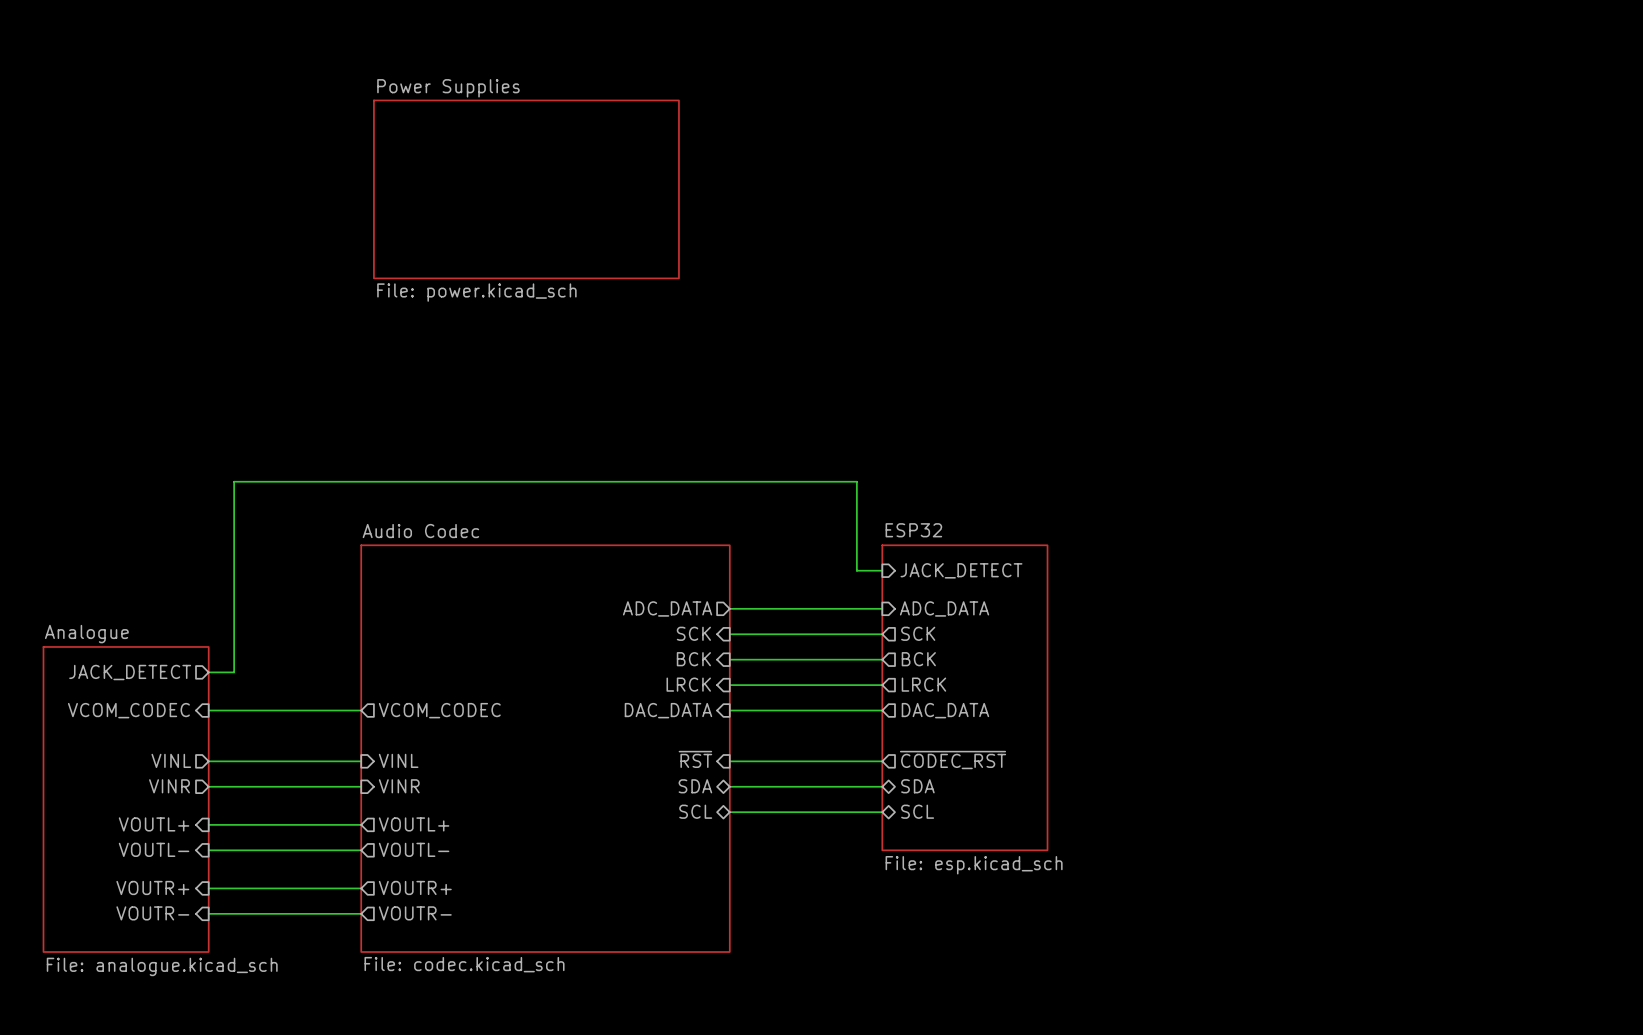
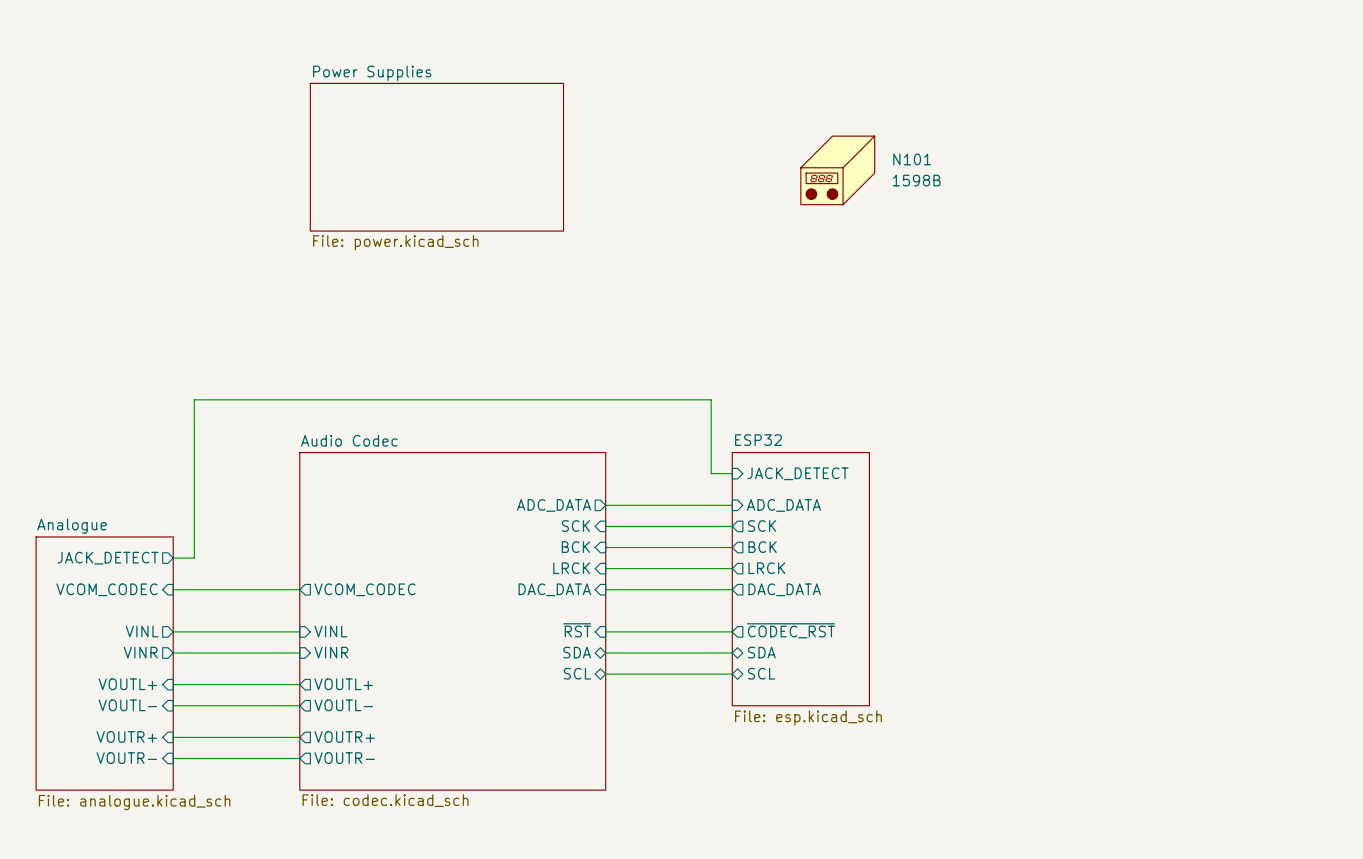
N101: none -> 1598B (837, 170)

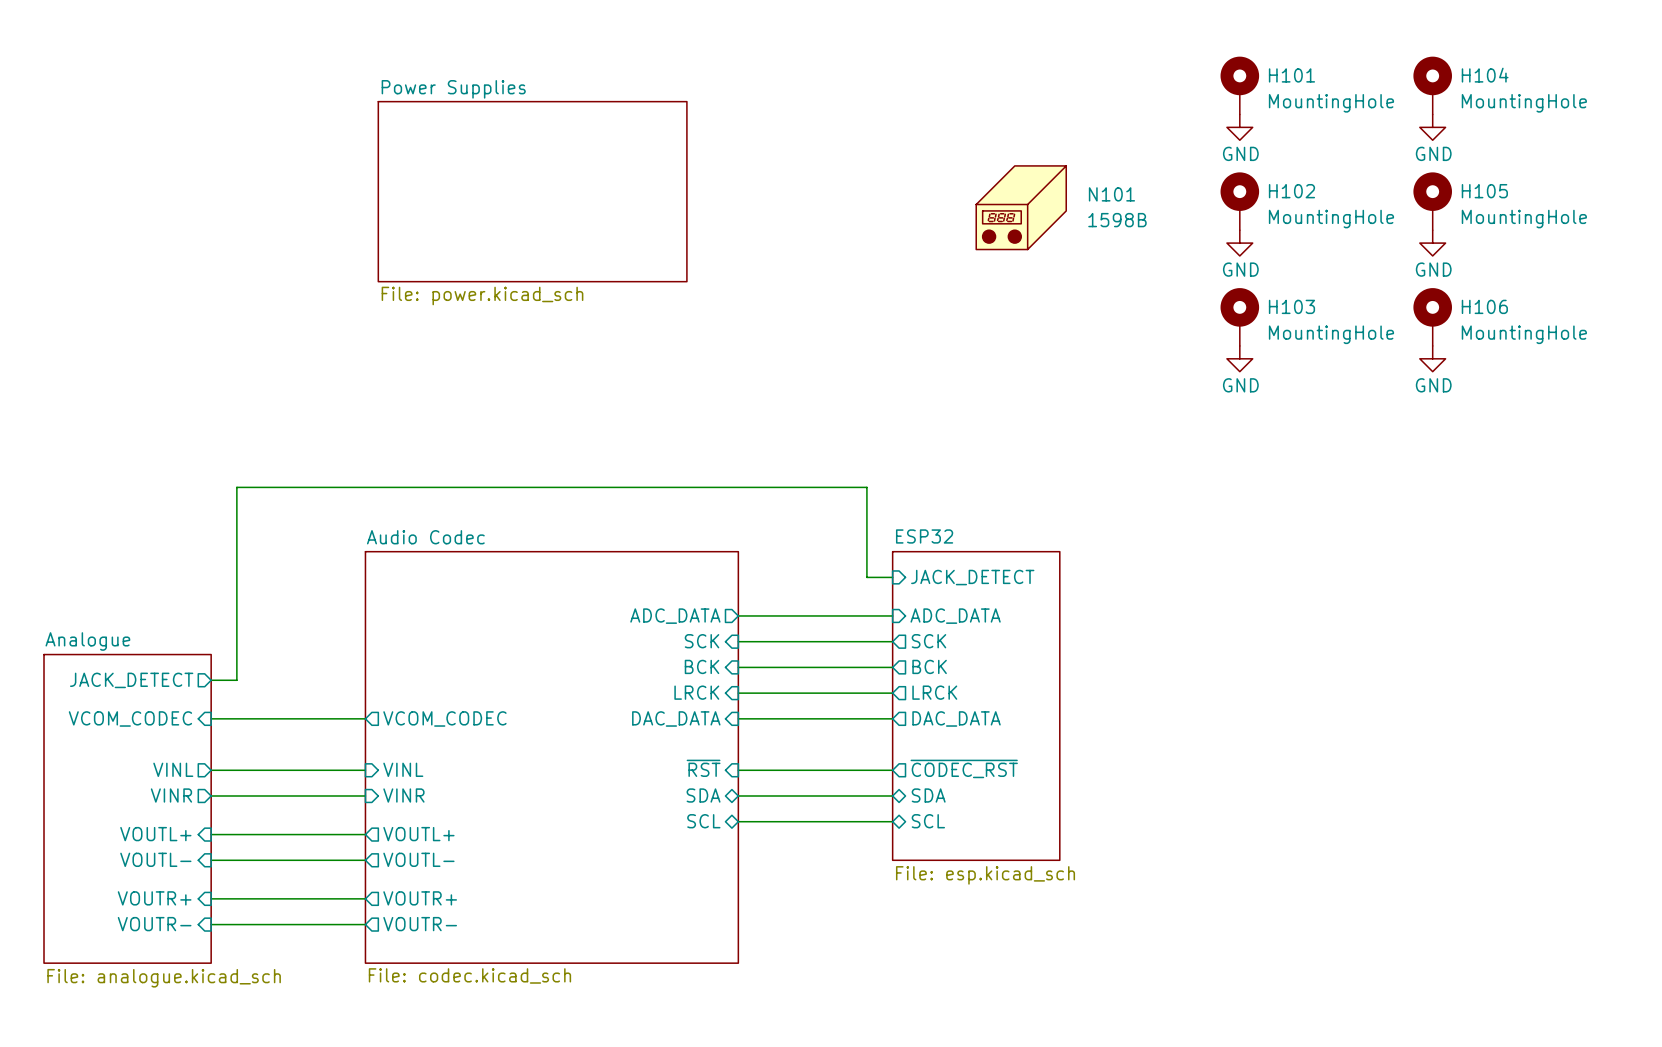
H101: none -> MountingHole (1239, 85)
H104: none -> MountingHole (1432, 85)
power symbol: none -> GND (1239, 127)
power symbol: none -> GND (1432, 127)
H102: none -> MountingHole (1239, 201)
H105: none -> MountingHole (1432, 201)
power symbol: none -> GND (1239, 243)
power symbol: none -> GND (1432, 243)
H103: none -> MountingHole (1239, 317)
H106: none -> MountingHole (1432, 317)
power symbol: none -> GND (1239, 358)
power symbol: none -> GND (1432, 358)

